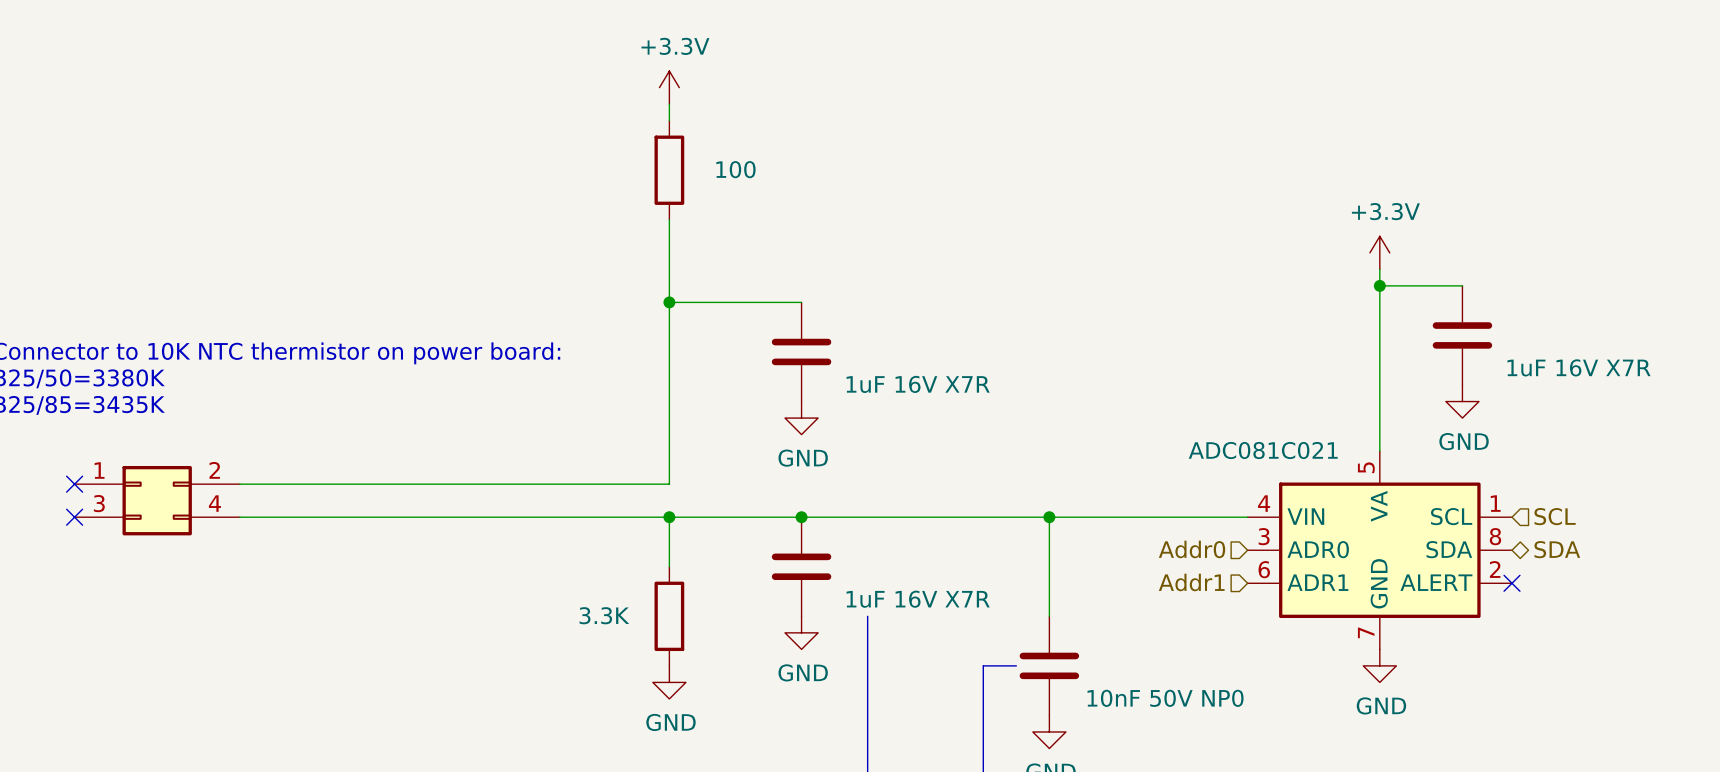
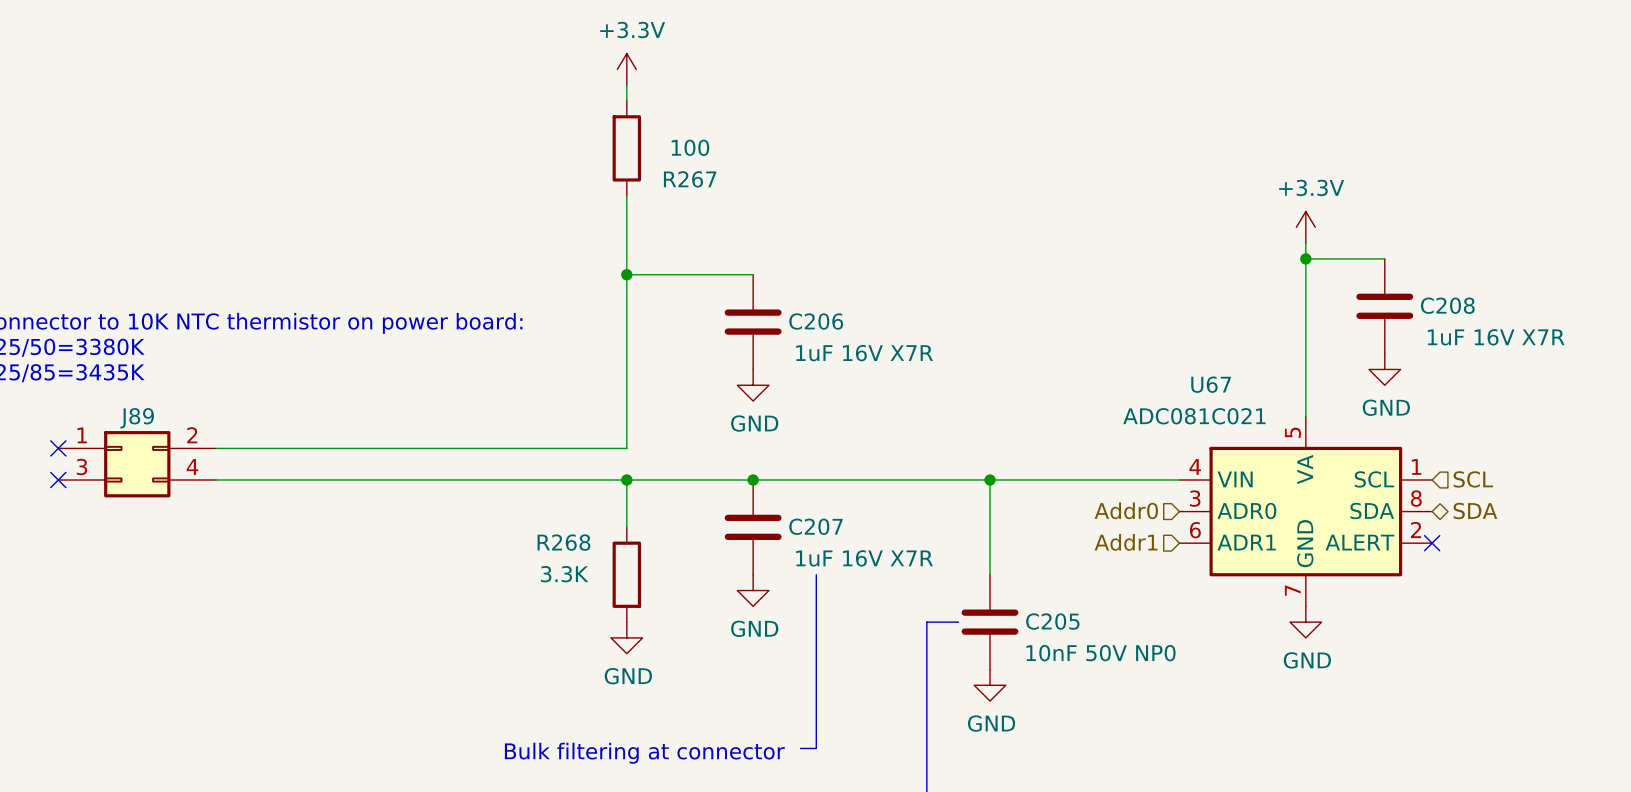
R267 name: none -> R267 (690, 179)
C208 name: none -> C208 (1447, 305)
C206 name: none -> C206 (816, 321)
U67 name: none -> U67 (1211, 384)
J89 name: none -> J89 (137, 418)
C207 name: none -> C207 (815, 526)
R268 name: none -> R268 (563, 542)
C205 name: none -> C205 (1052, 621)

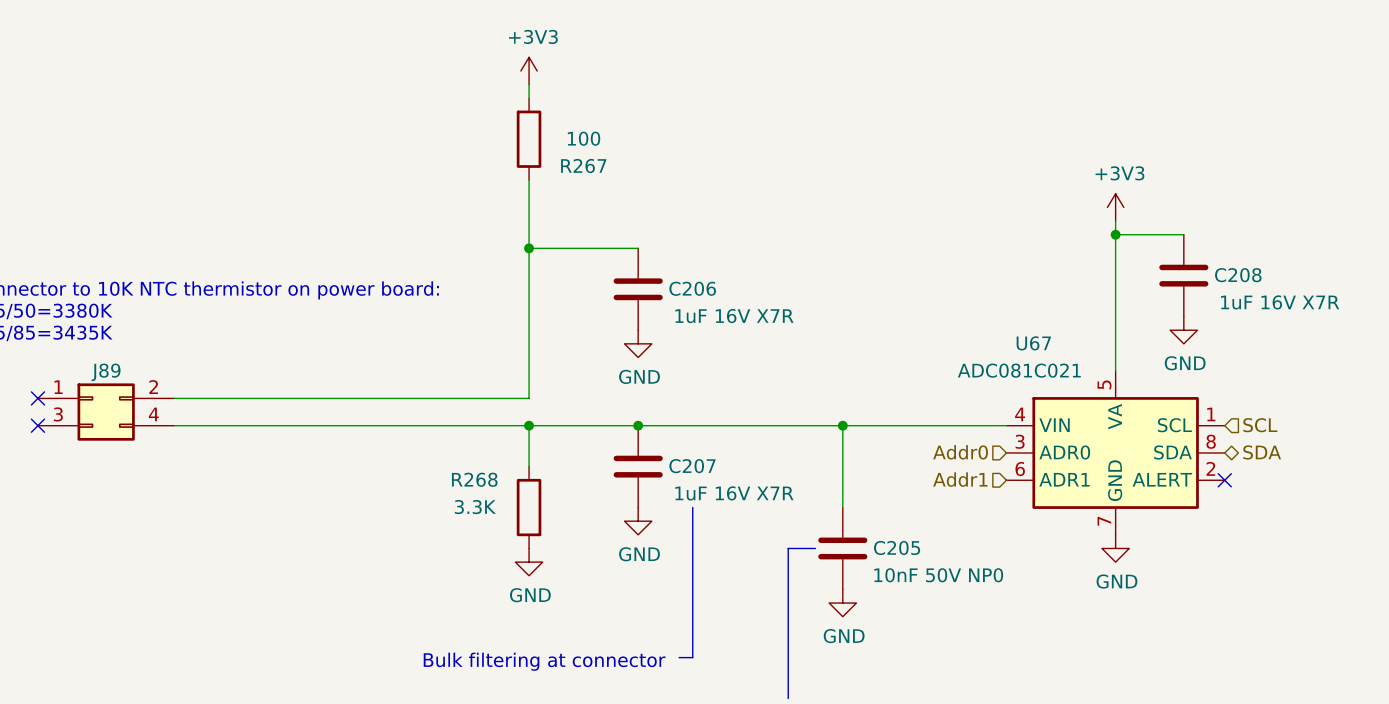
power symbol: +3.3V (626, 69) -> +3V3 (529, 71)
power symbol: +3.3V (1305, 227) -> +3V3 (1115, 207)

